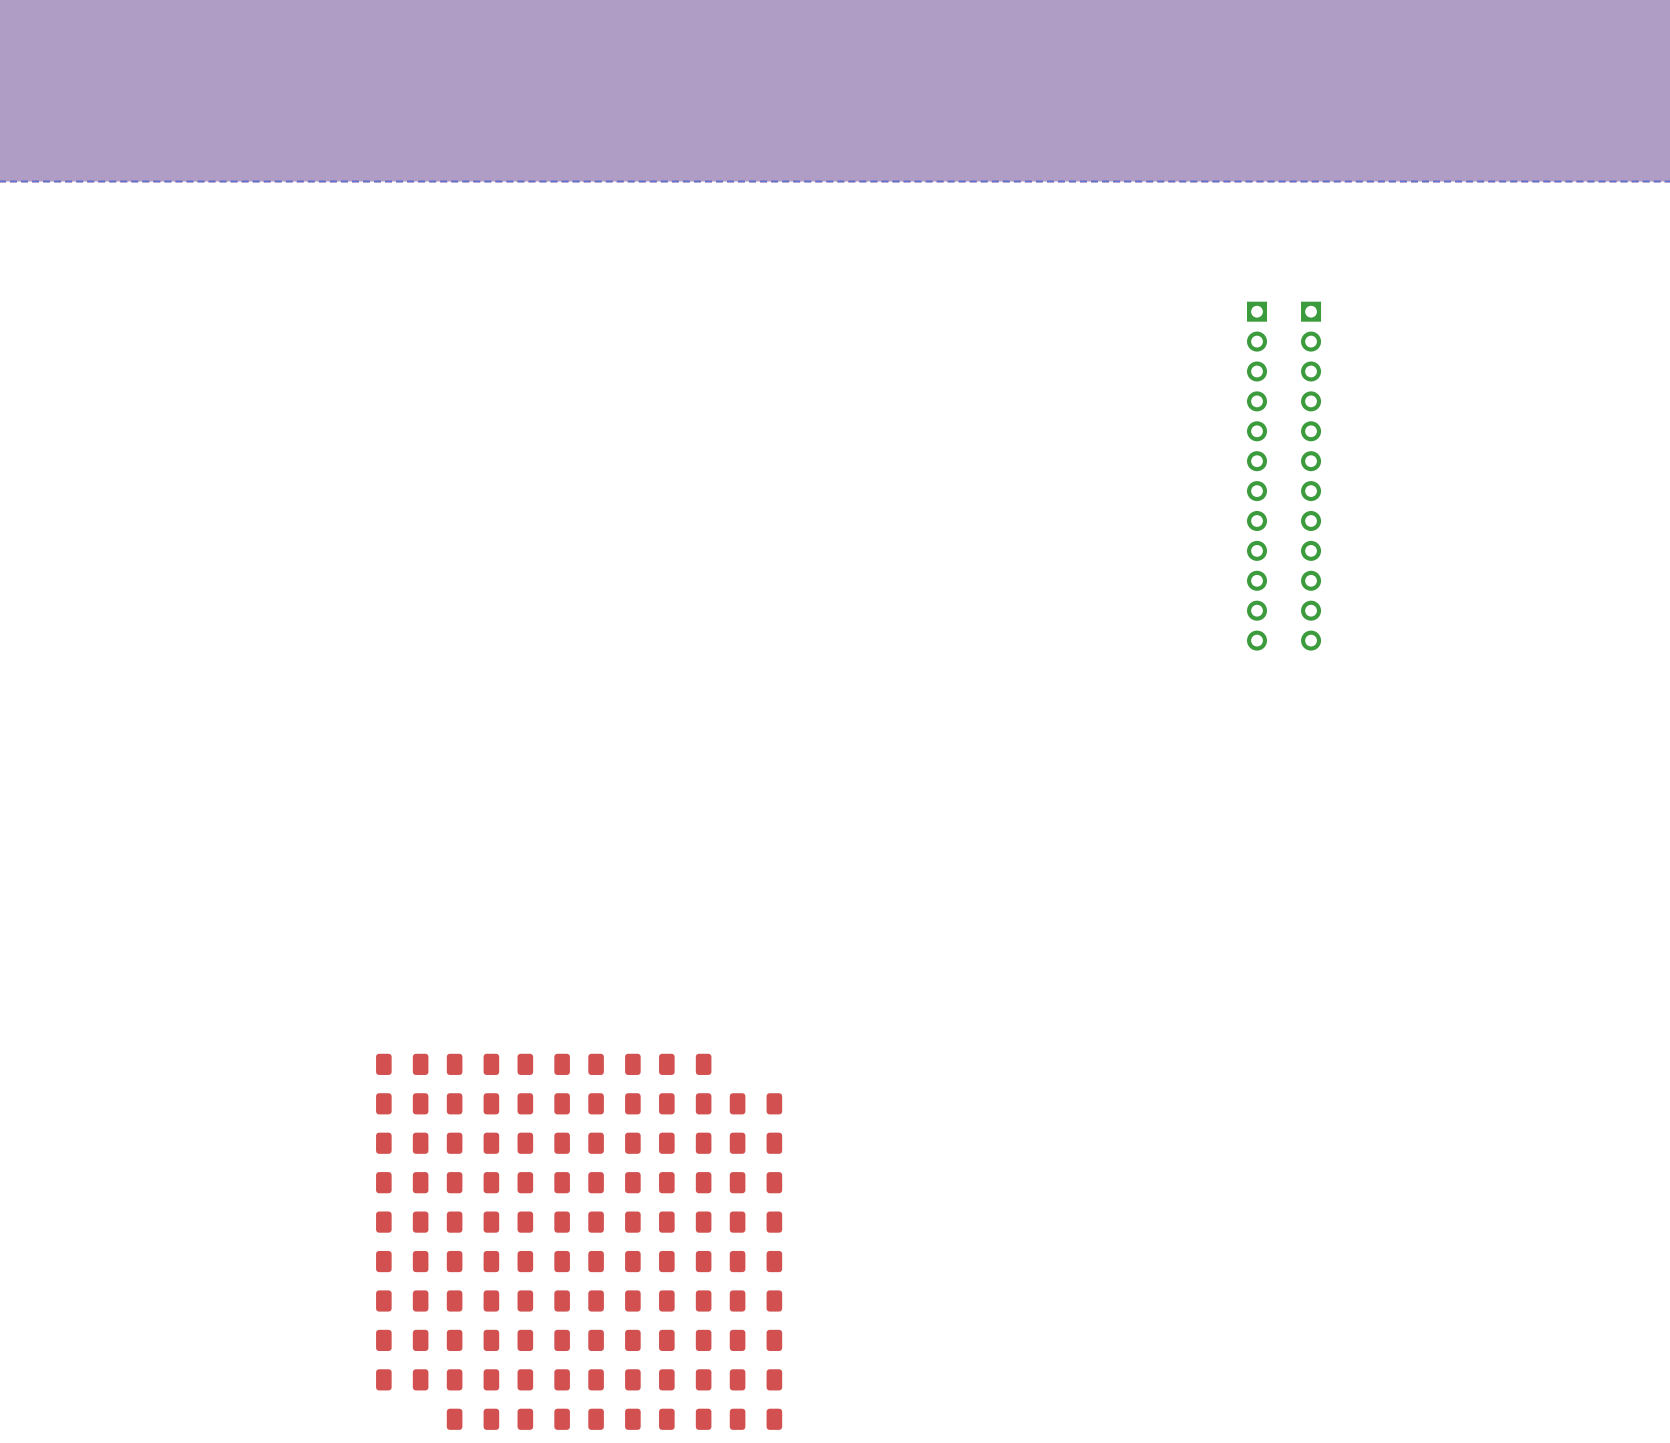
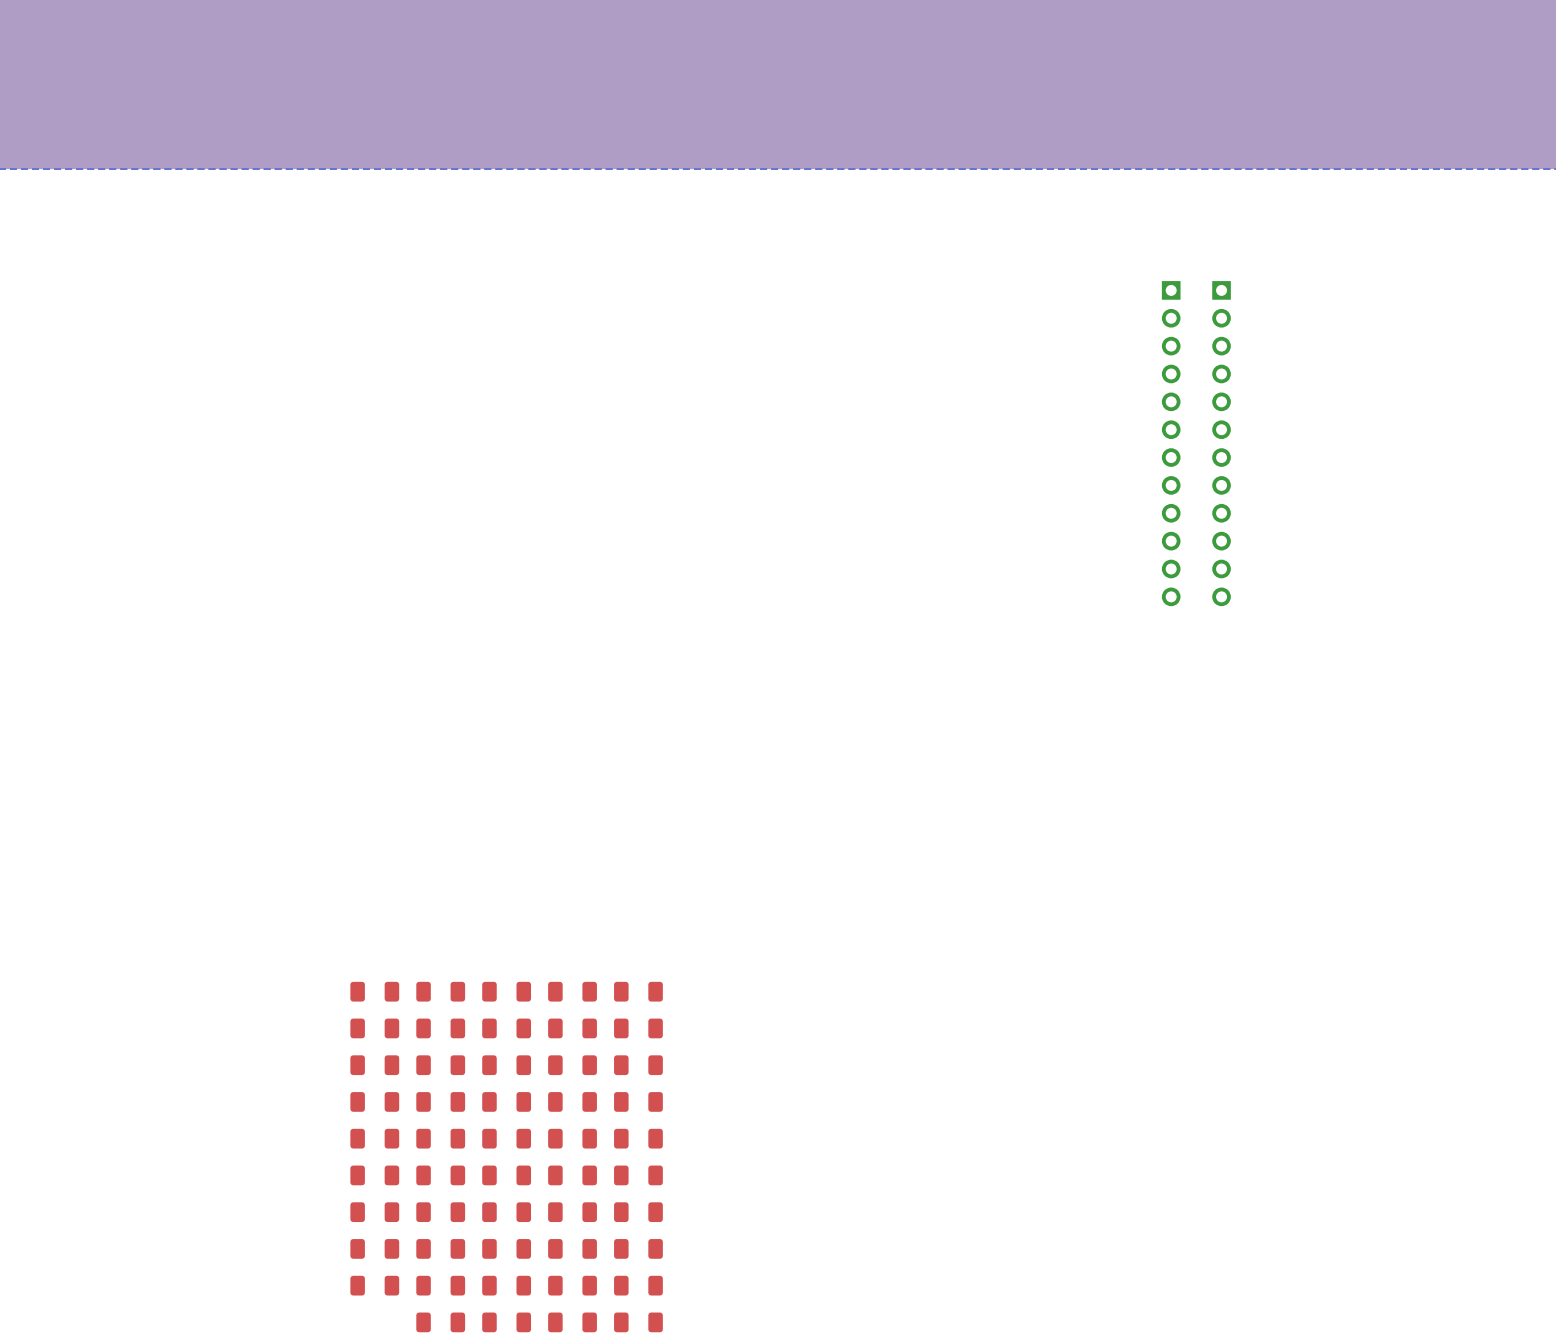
part: (755, 1103) -> none
part: (755, 1143) -> none
part: (755, 1182) -> none
part: (755, 1222) -> none
part: (755, 1261) -> none
part: (755, 1300) -> none
part: (755, 1340) -> none
part: (755, 1379) -> none
part: (755, 1419) -> none

